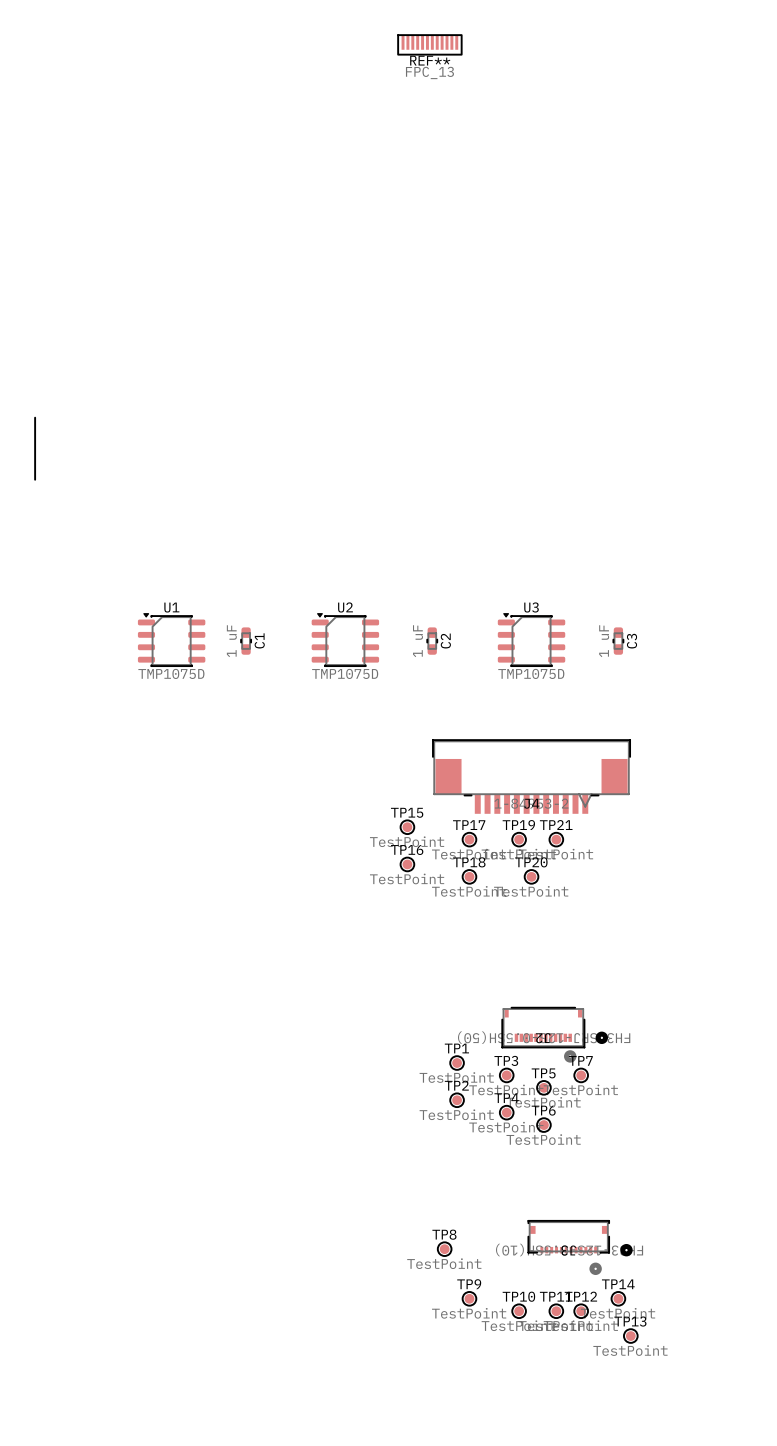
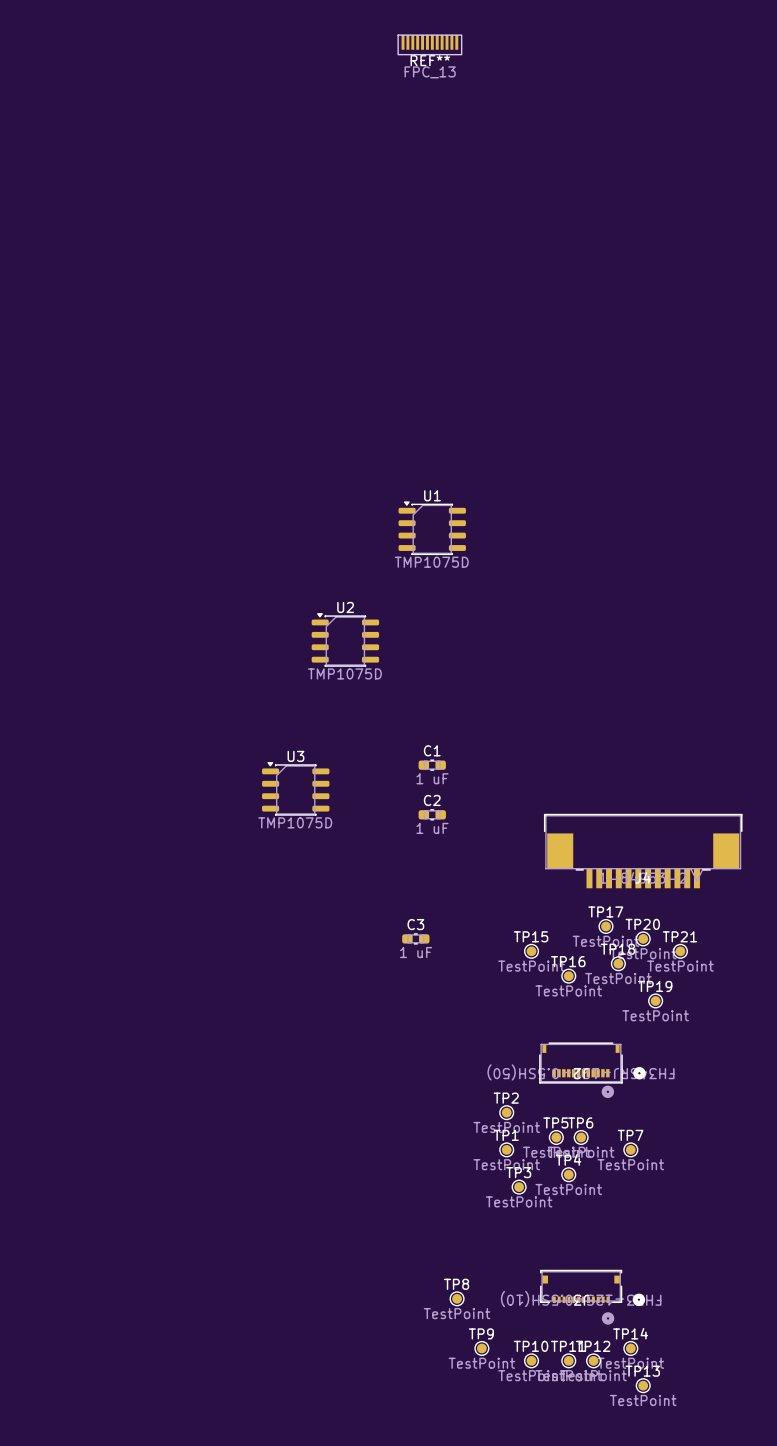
board edge: (35, 417) (35, 479) -> none
U1 position: (171, 639) -> (432, 528)
U3 position: (531, 639) -> (295, 788)
C1 name position: C1 (259, 640) -> C1 (432, 750)
C1 value position: 1 uF (231, 641) -> 1 uF (432, 778)
C1 rotation: 0° (246, 641) -> 90° clockwise (432, 765)
C1 position: (246, 641) -> (432, 765)
C2 value position: 1 uF (417, 641) -> 1 uF (432, 828)
C2 rotation: 0° (432, 641) -> 90° clockwise (432, 814)
C2 position: (432, 641) -> (432, 814)
C2 name position: C2 (445, 641) -> C2 (432, 800)
C3 value position: 1 uF (604, 641) -> 1 uF (416, 952)
C3 rotation: 0° (618, 641) -> 90° clockwise (415, 938)
C3 position: (618, 641) -> (415, 938)
C3 name position: C3 (632, 641) -> C3 (415, 924)
J4 position: (531, 776) -> (643, 851)
TP15 position: (407, 827) -> (531, 951)
TP17 position: (469, 839) -> (605, 926)
TP19 position: (519, 839) -> (655, 1000)
TP21 position: (556, 839) -> (680, 951)
TP16 position: (407, 864) -> (568, 976)
TP18 position: (469, 876) -> (618, 963)
TP20 position: (531, 876) -> (643, 938)
J2 position: (554, 1034) -> (592, 1070)
TP1 position: (457, 1063) -> (506, 1149)
TP3 position: (506, 1075) -> (519, 1187)
TP7 position: (581, 1075) -> (630, 1149)
TP5 position: (543, 1087) -> (556, 1137)
TP4 name: TP4 (506, 1098) -> TP2 (506, 1098)
TP2: TestPoint (457, 1100) -> none
TP6 position: (543, 1125) -> (581, 1137)
TP4: none -> TestPoint (568, 1174)
J3 position: (580, 1247) -> (592, 1297)
TP8 position: (444, 1249) -> (457, 1298)
TP9 position: (469, 1298) -> (481, 1348)
TP14 position: (618, 1298) -> (630, 1348)
TP10 position: (519, 1311) -> (531, 1360)
TP11 position: (556, 1311) -> (568, 1360)
TP12 position: (581, 1311) -> (593, 1360)
TP13 position: (630, 1336) -> (643, 1385)

